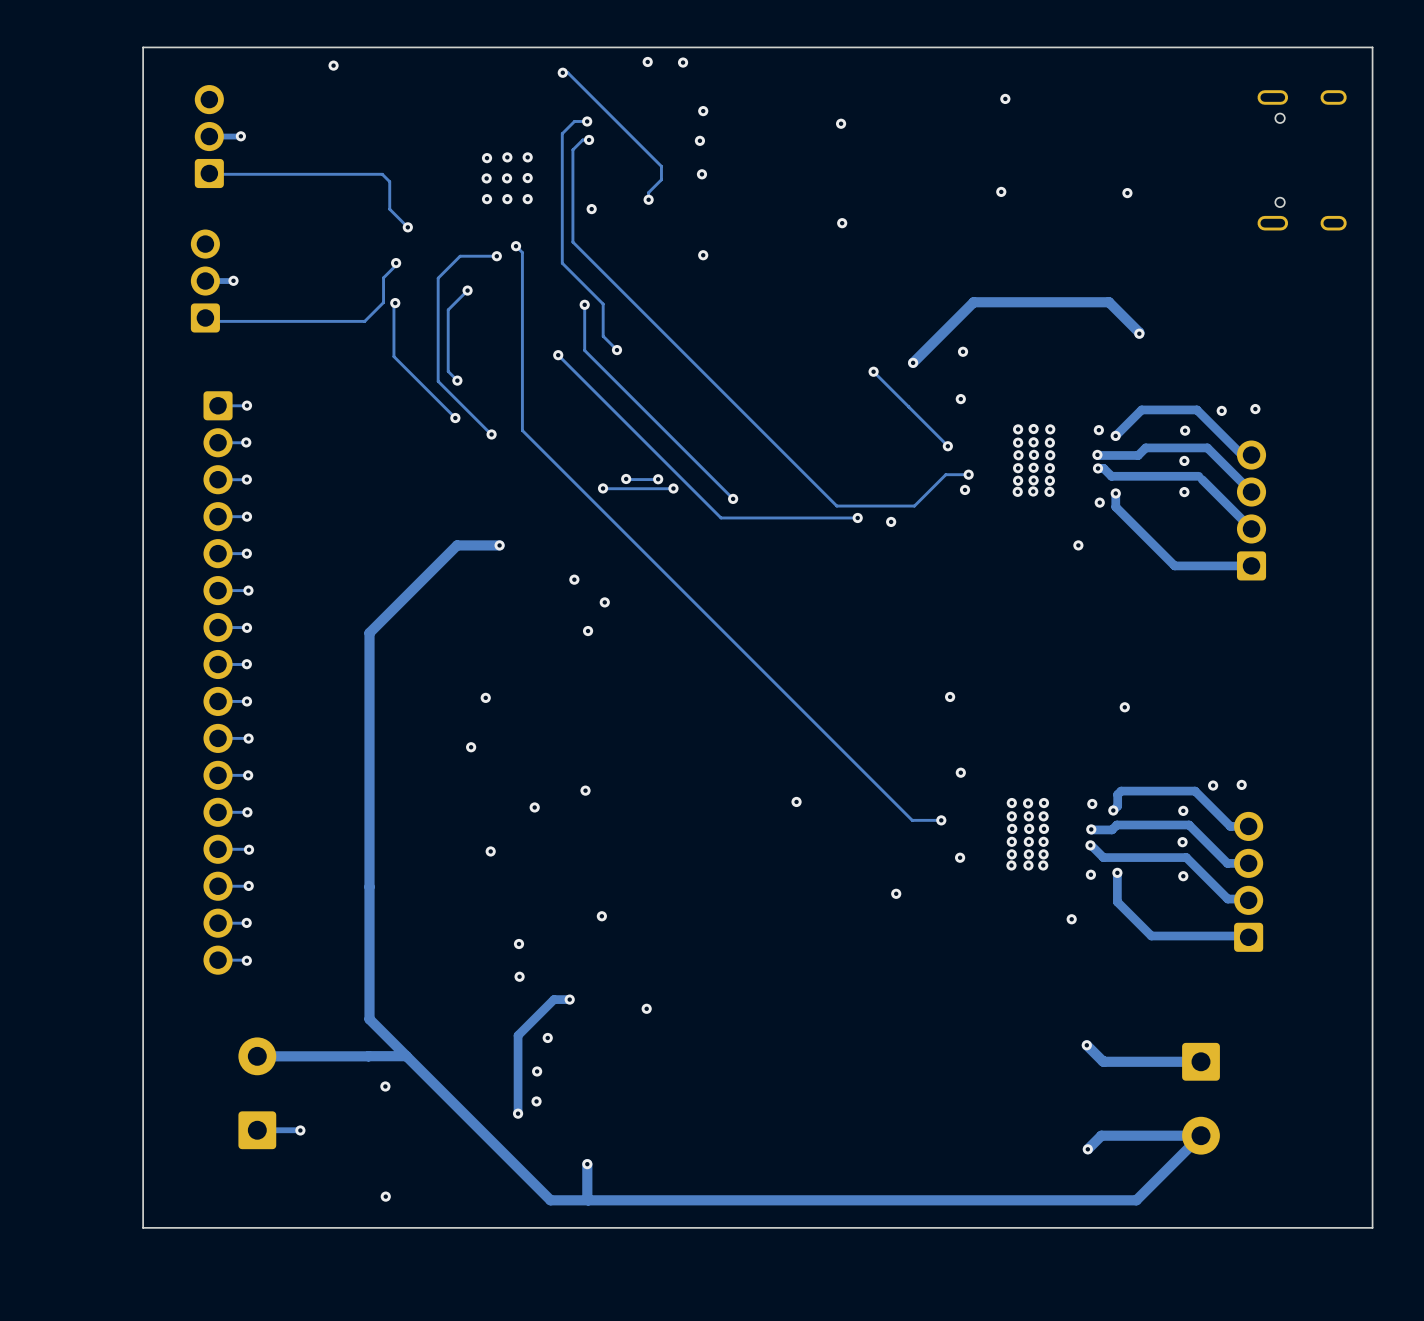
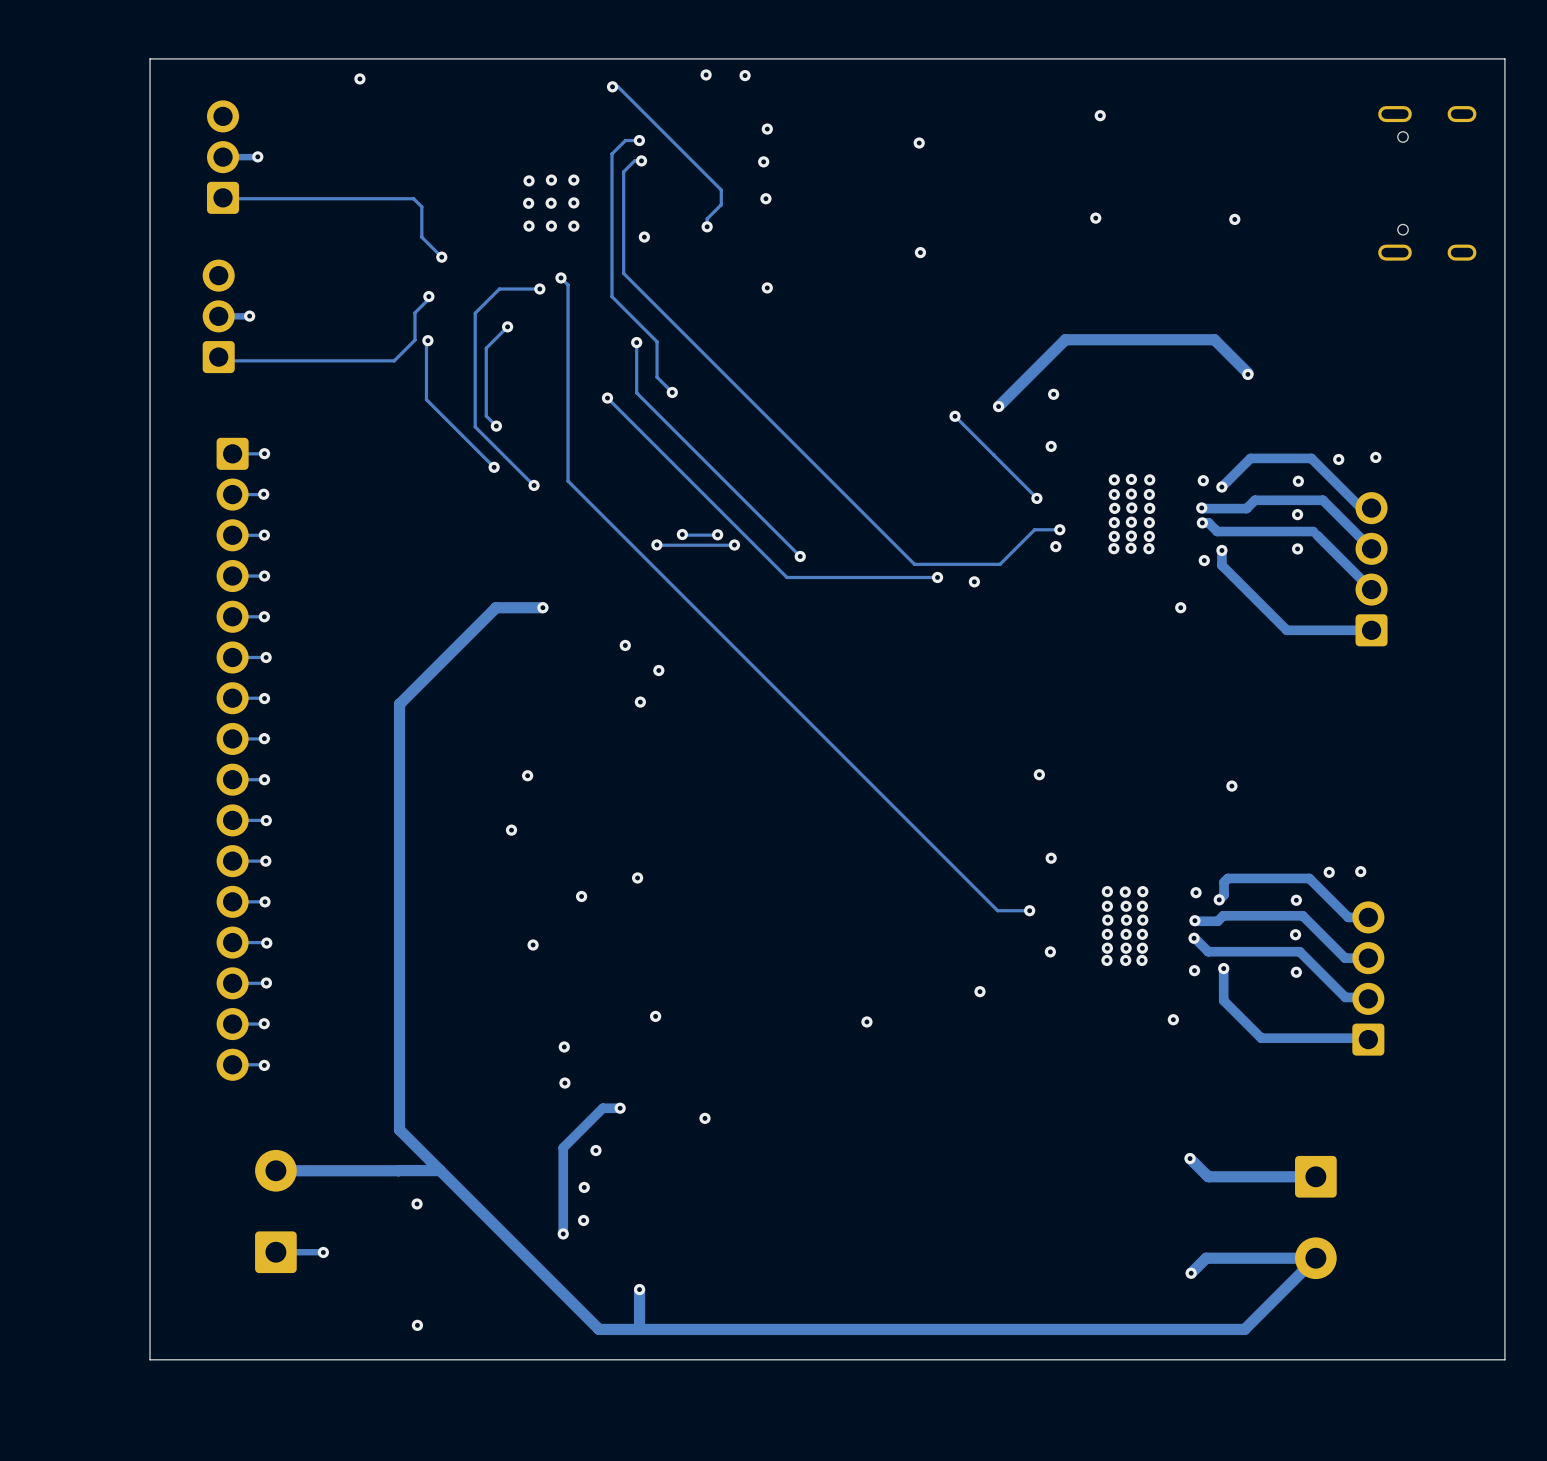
via: (796, 801) -> none
via: none -> (866, 1021)

